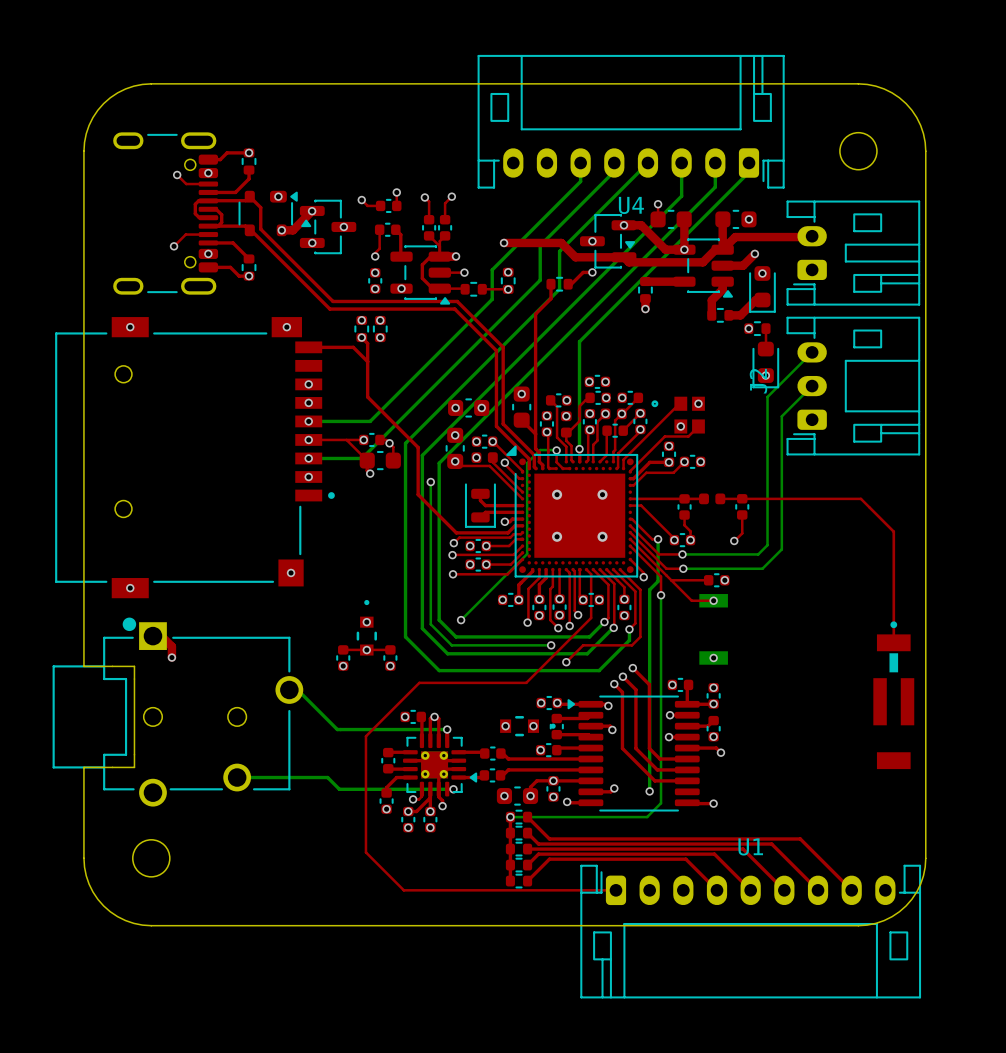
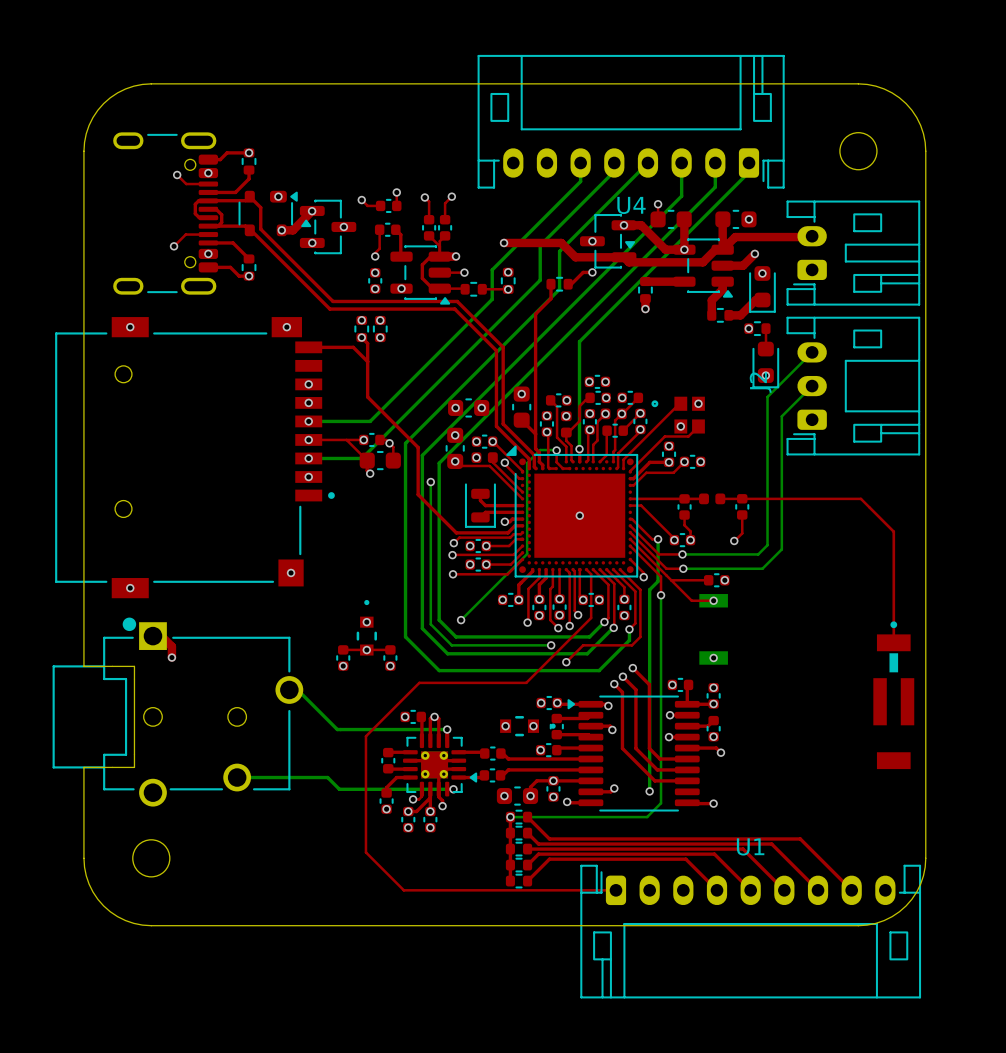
via: (557, 494) -> none
via: (602, 494) -> none
via: none -> (579, 515)
via: (557, 536) -> none
via: (602, 536) -> none

